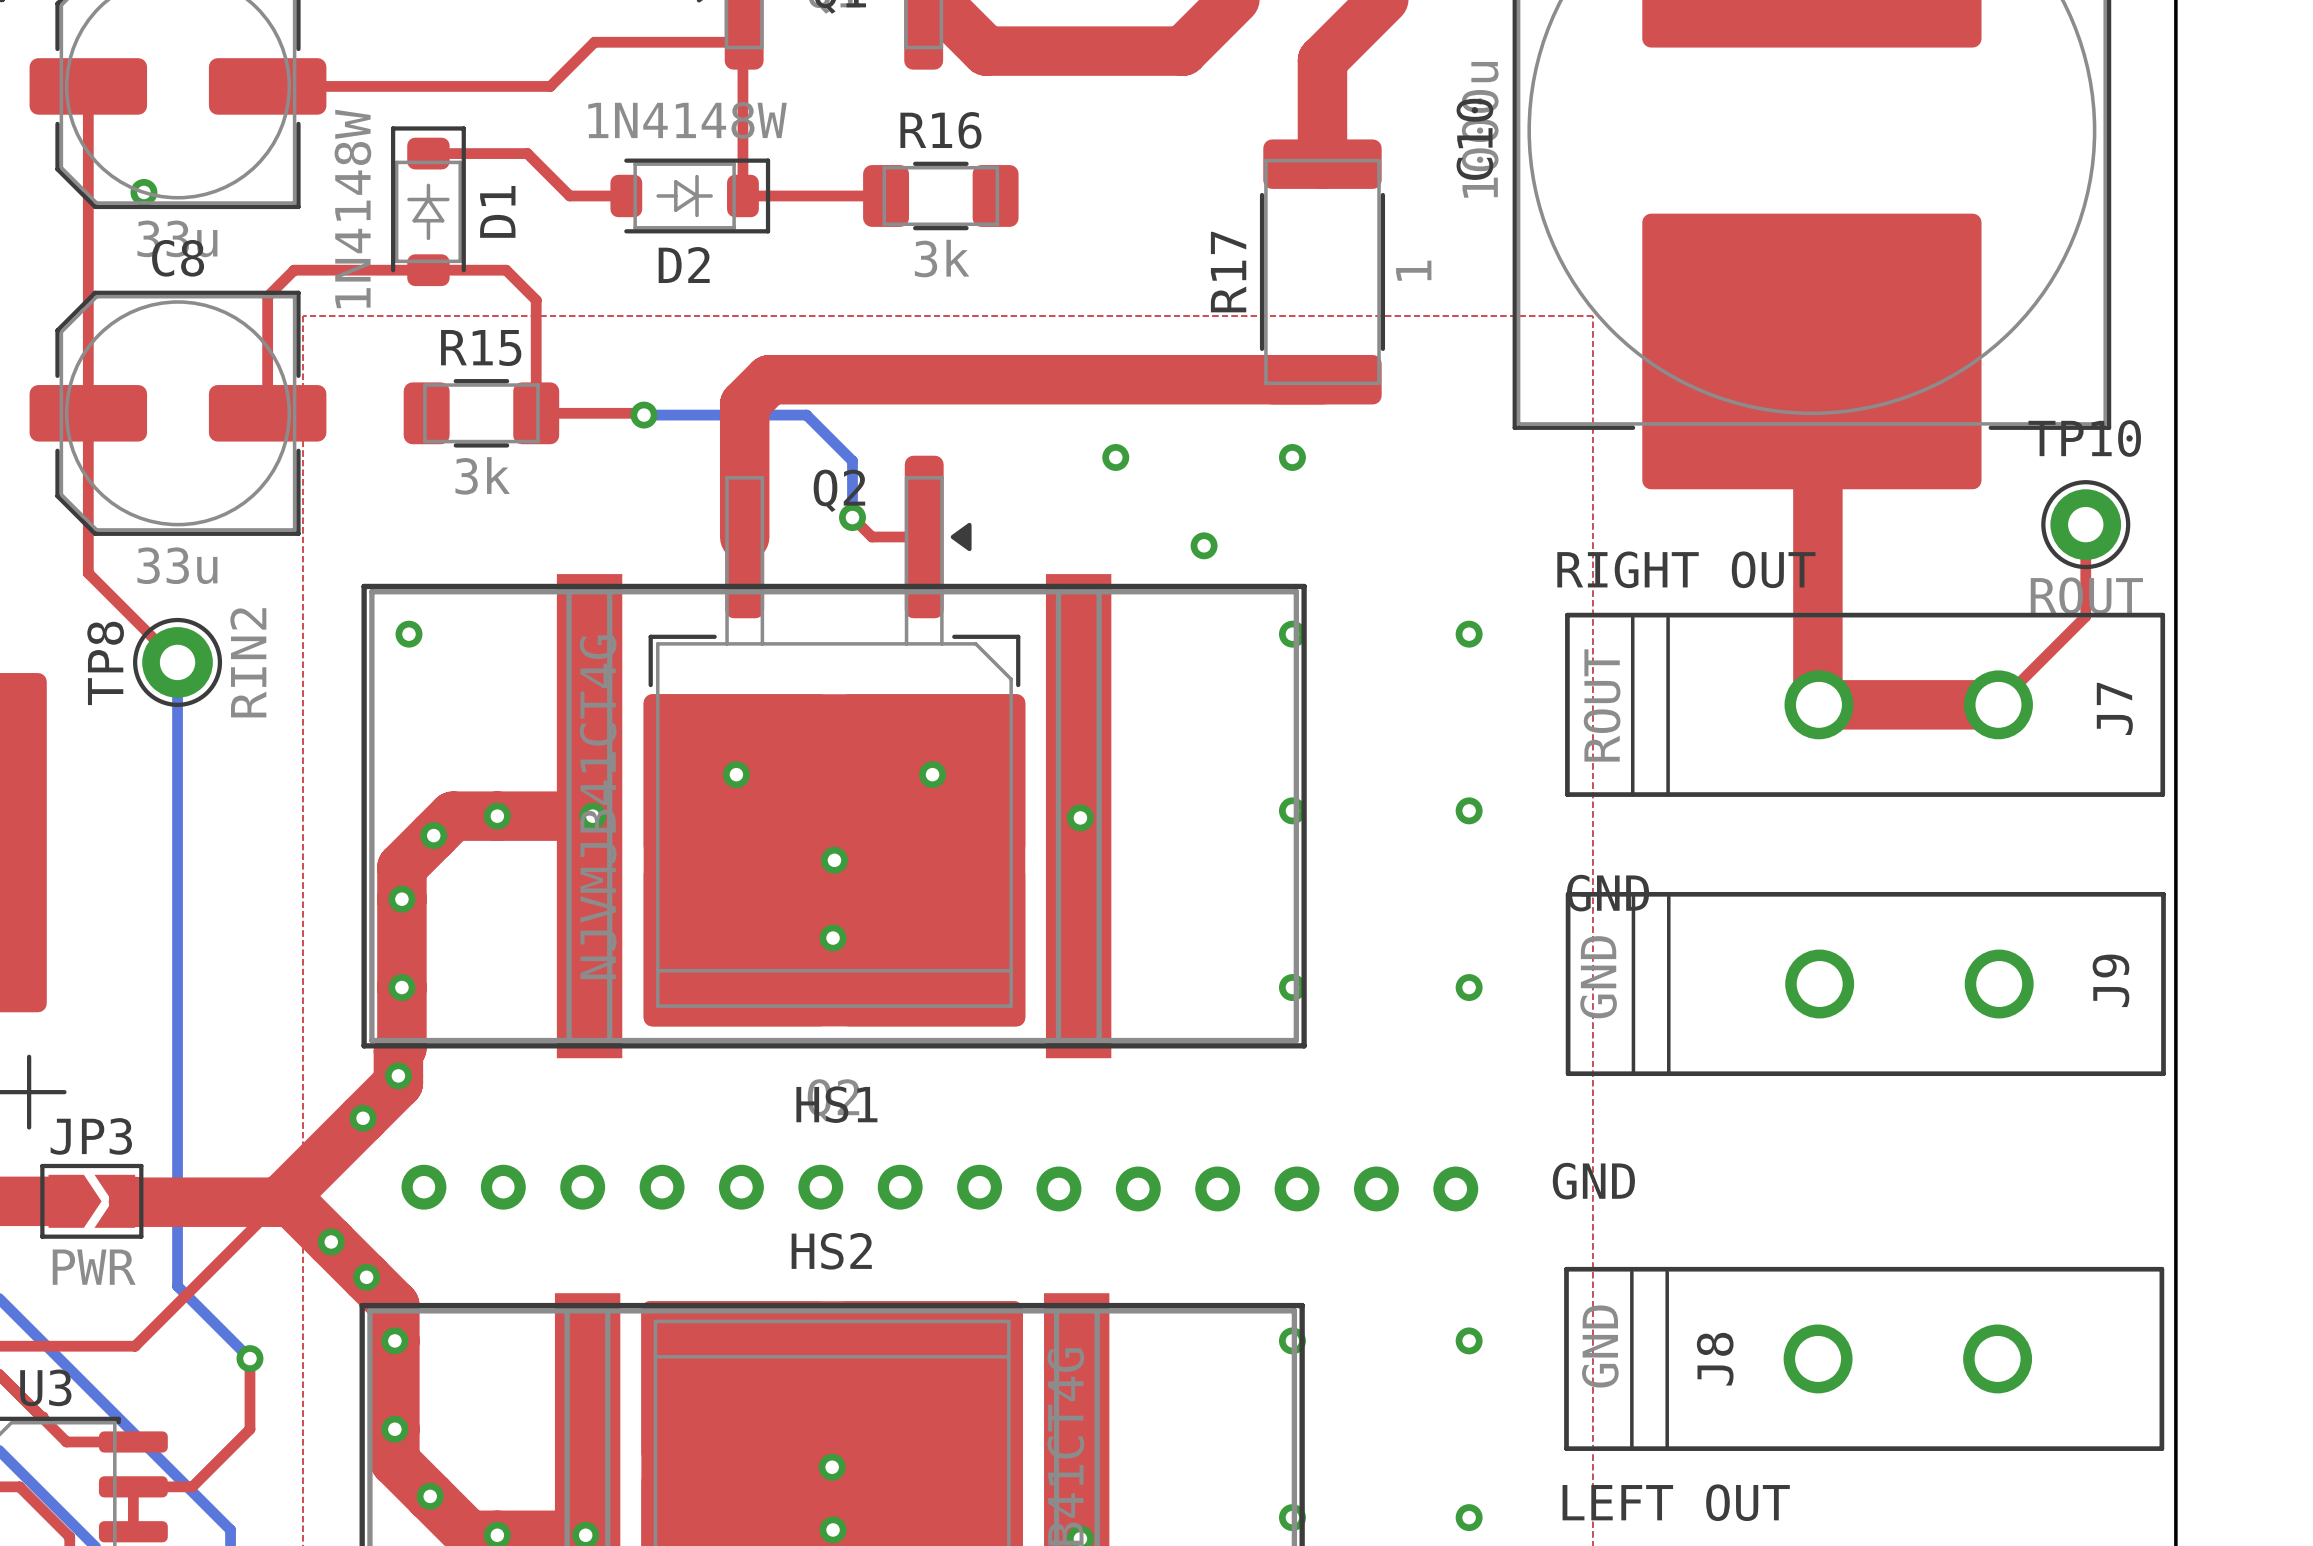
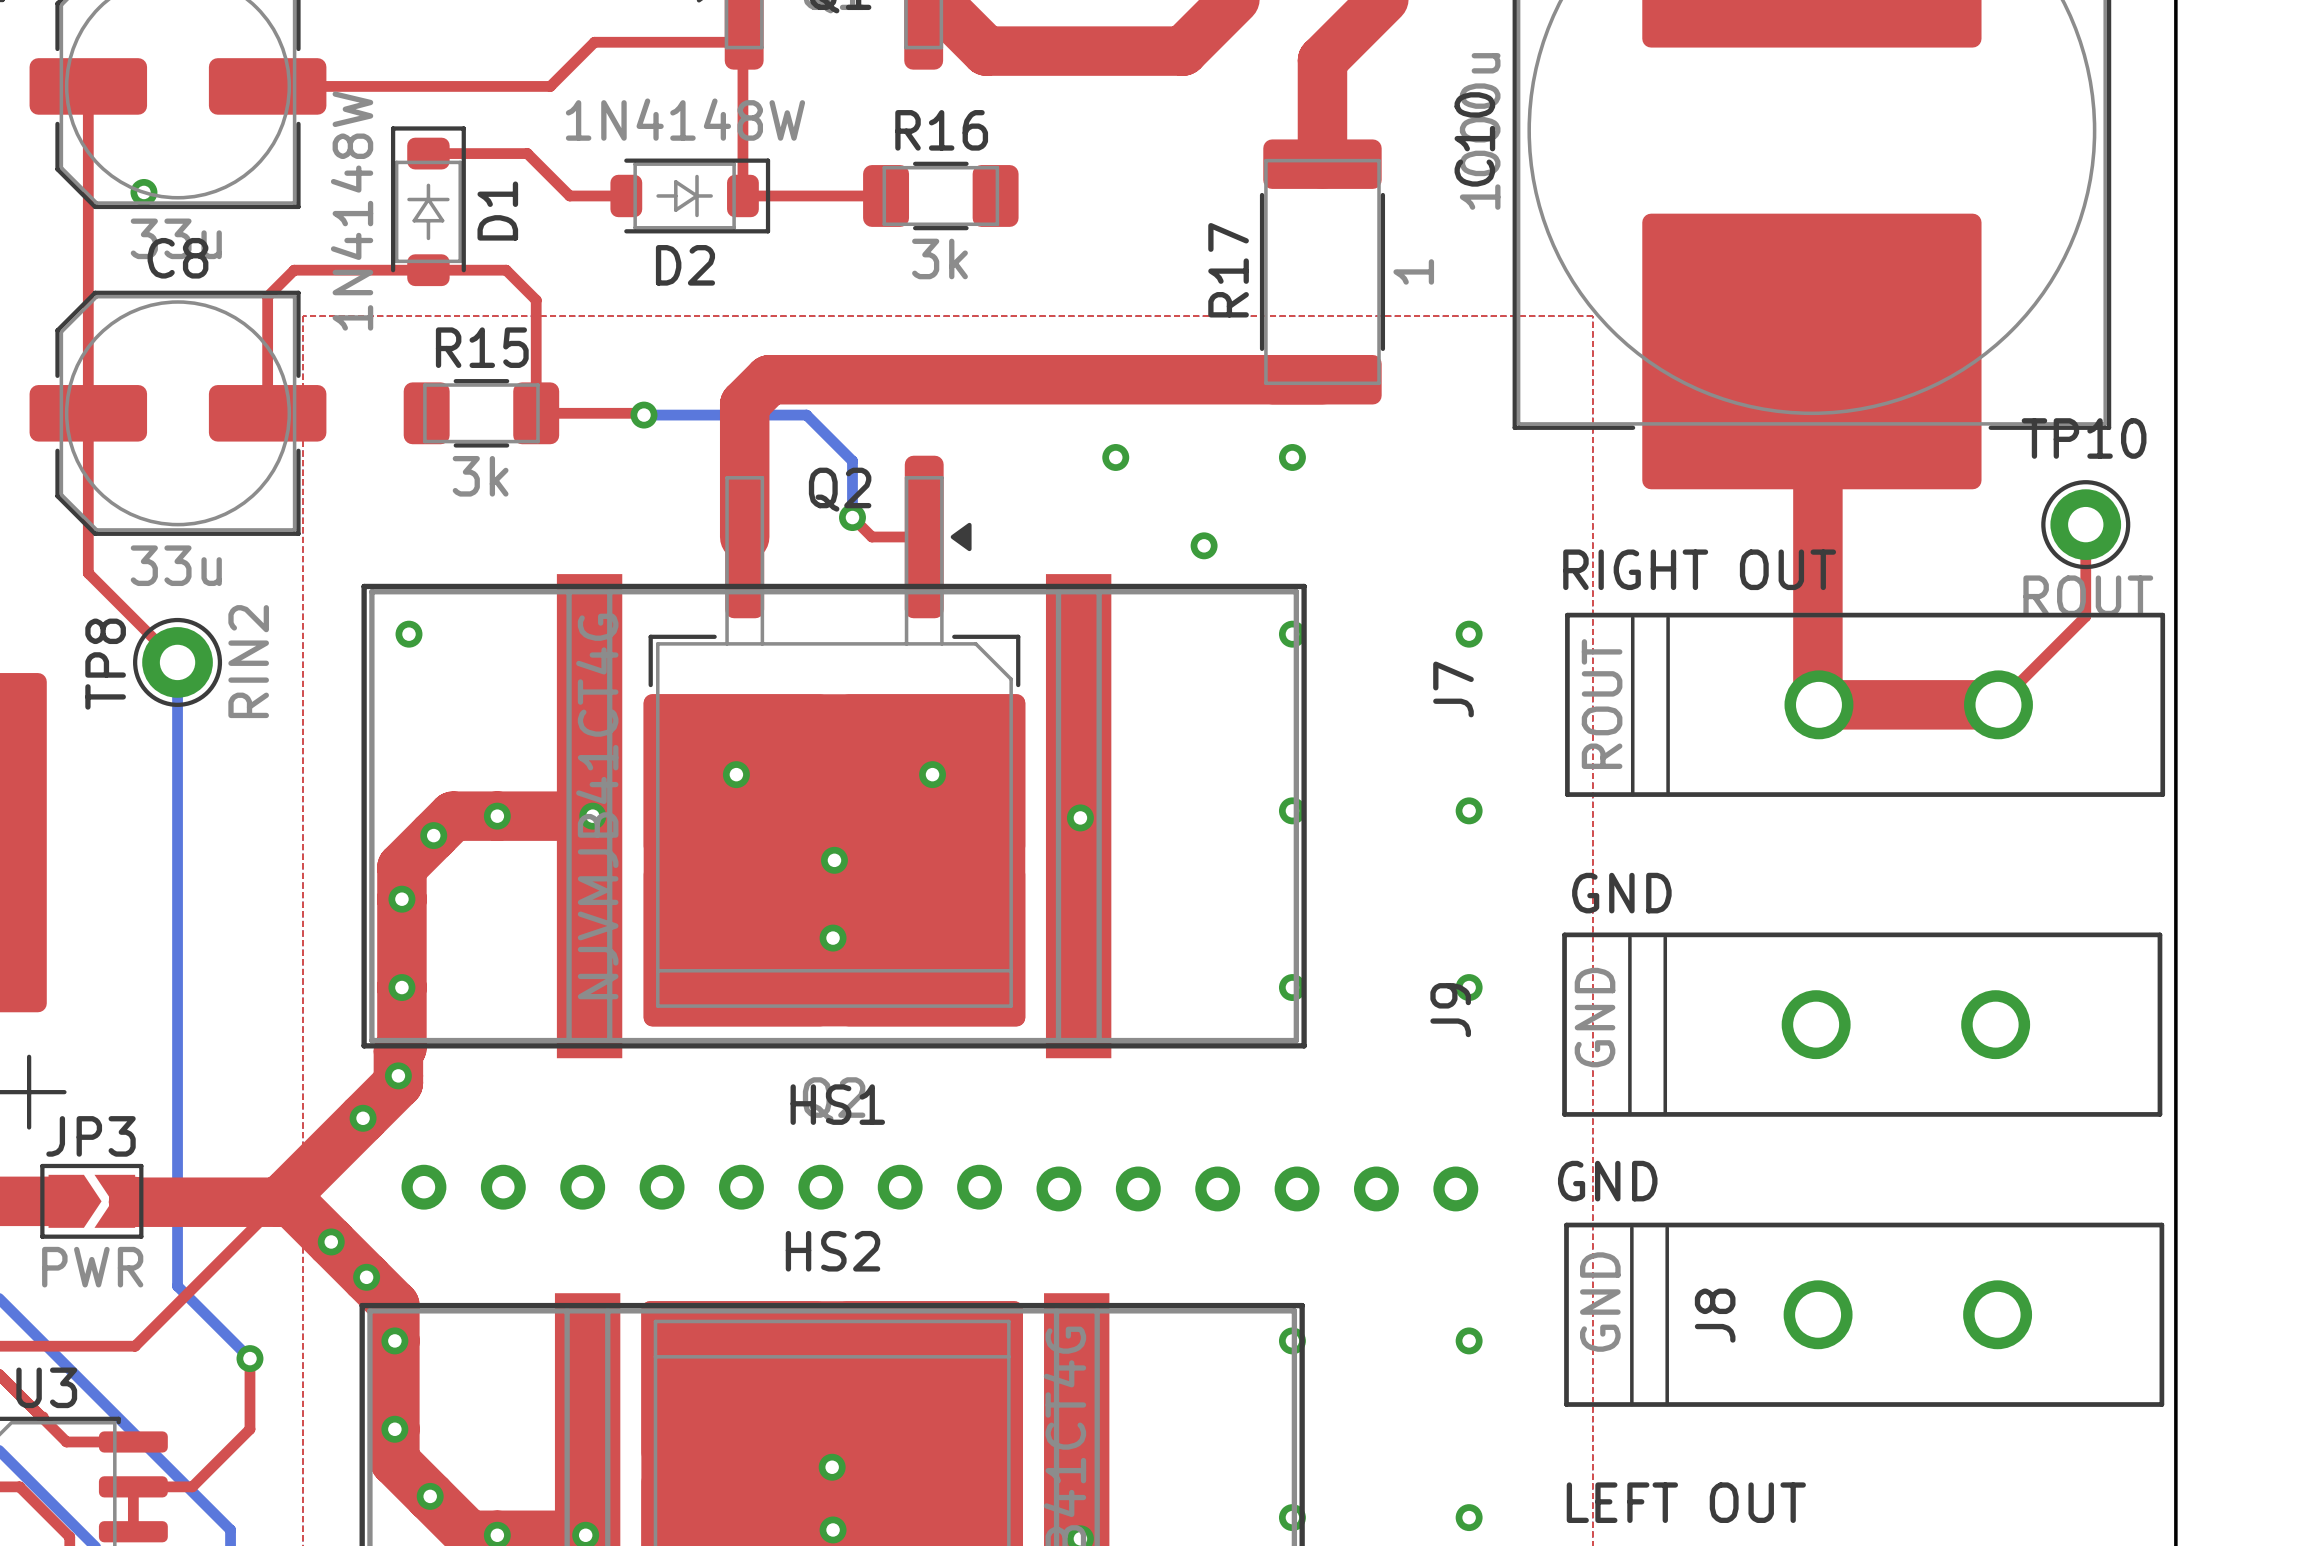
J7 name position: J7 (2114, 708) -> J7 (1453, 689)
J9 name position: J9 (2110, 980) -> J9 (1450, 1010)
J9 position: (1865, 984) -> (1862, 1024)
J8 position: (1864, 1358) -> (1864, 1314)

